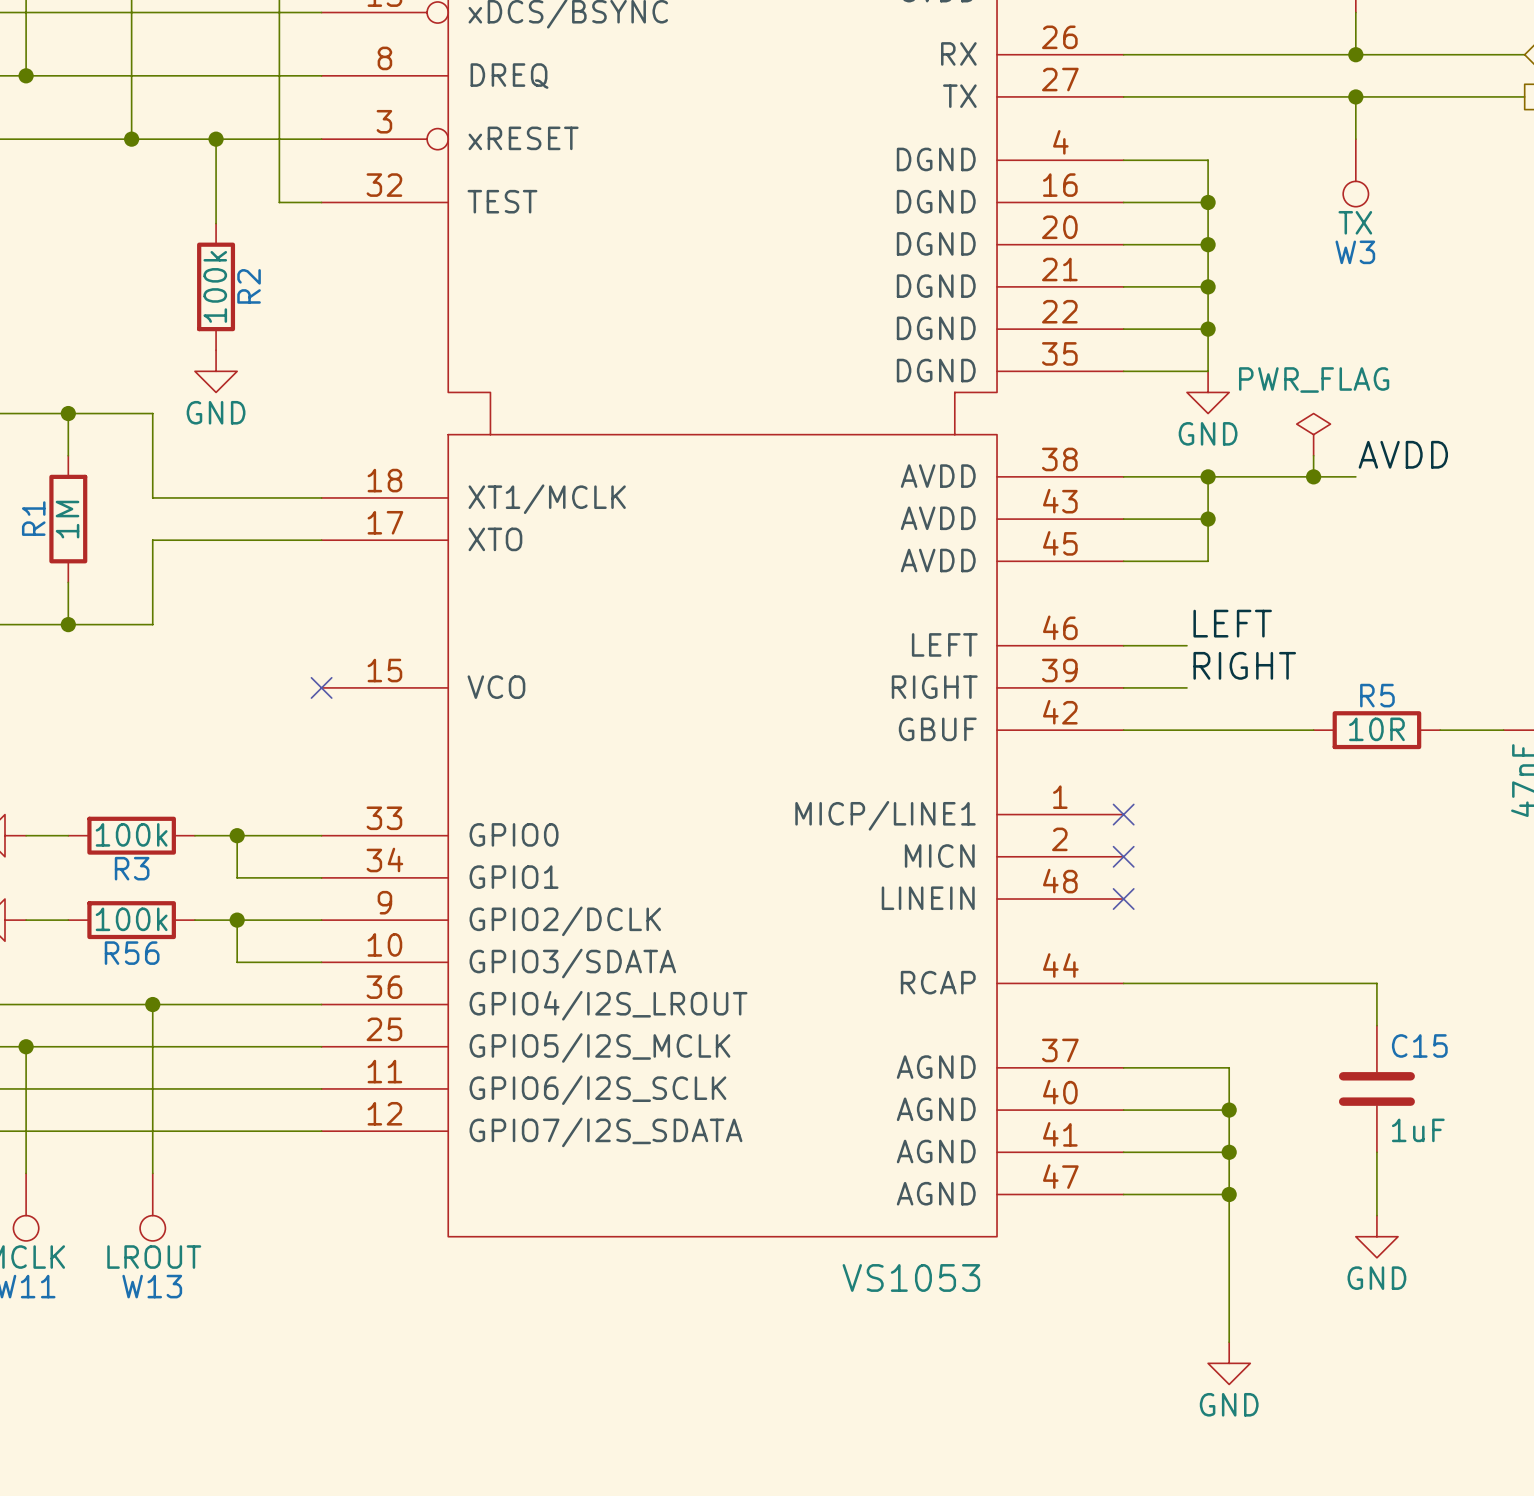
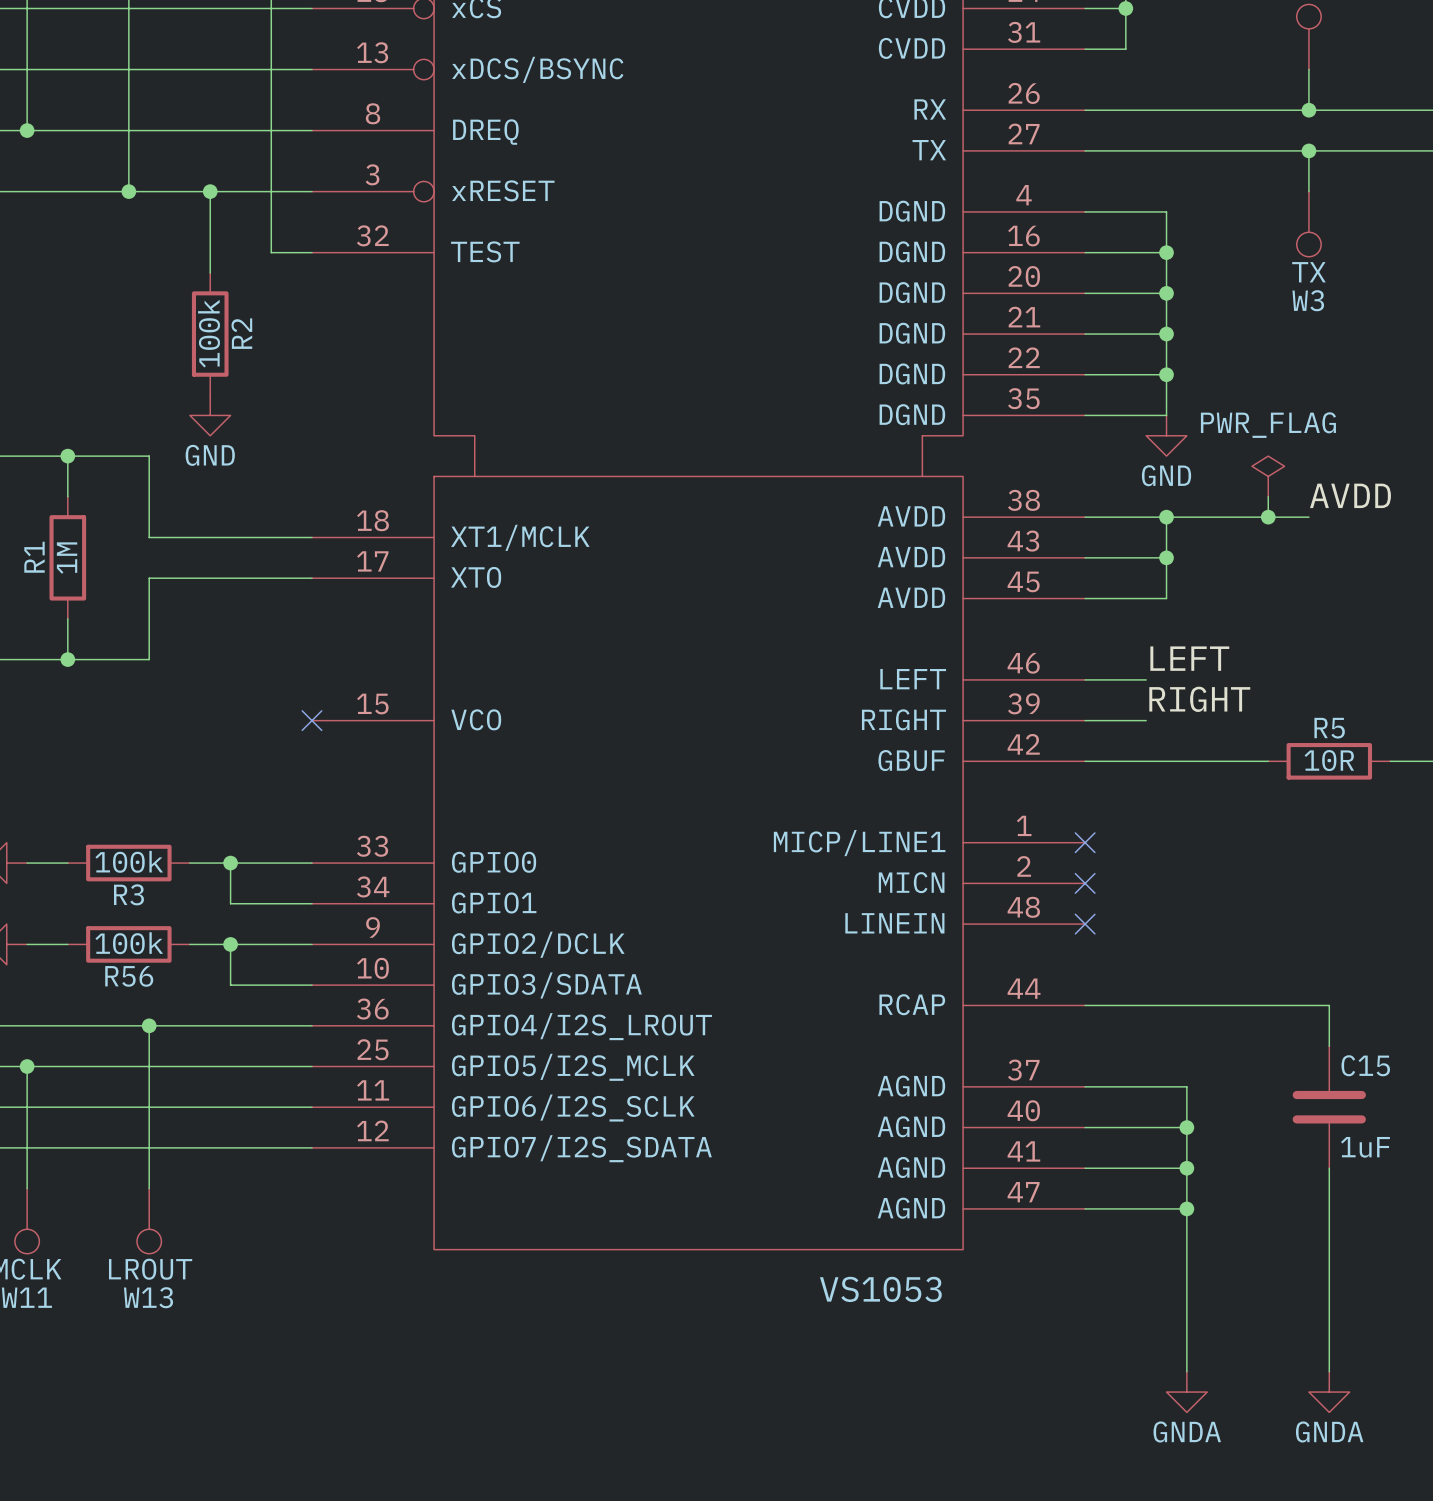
wire: none -> (1329, 1229) (1329, 1371)
power symbol: GND (1376, 1236) -> none
power symbol: GND (1229, 1363) -> none
power symbol: none -> GNDA (1186, 1392)
power symbol: none -> GNDA (1329, 1392)

